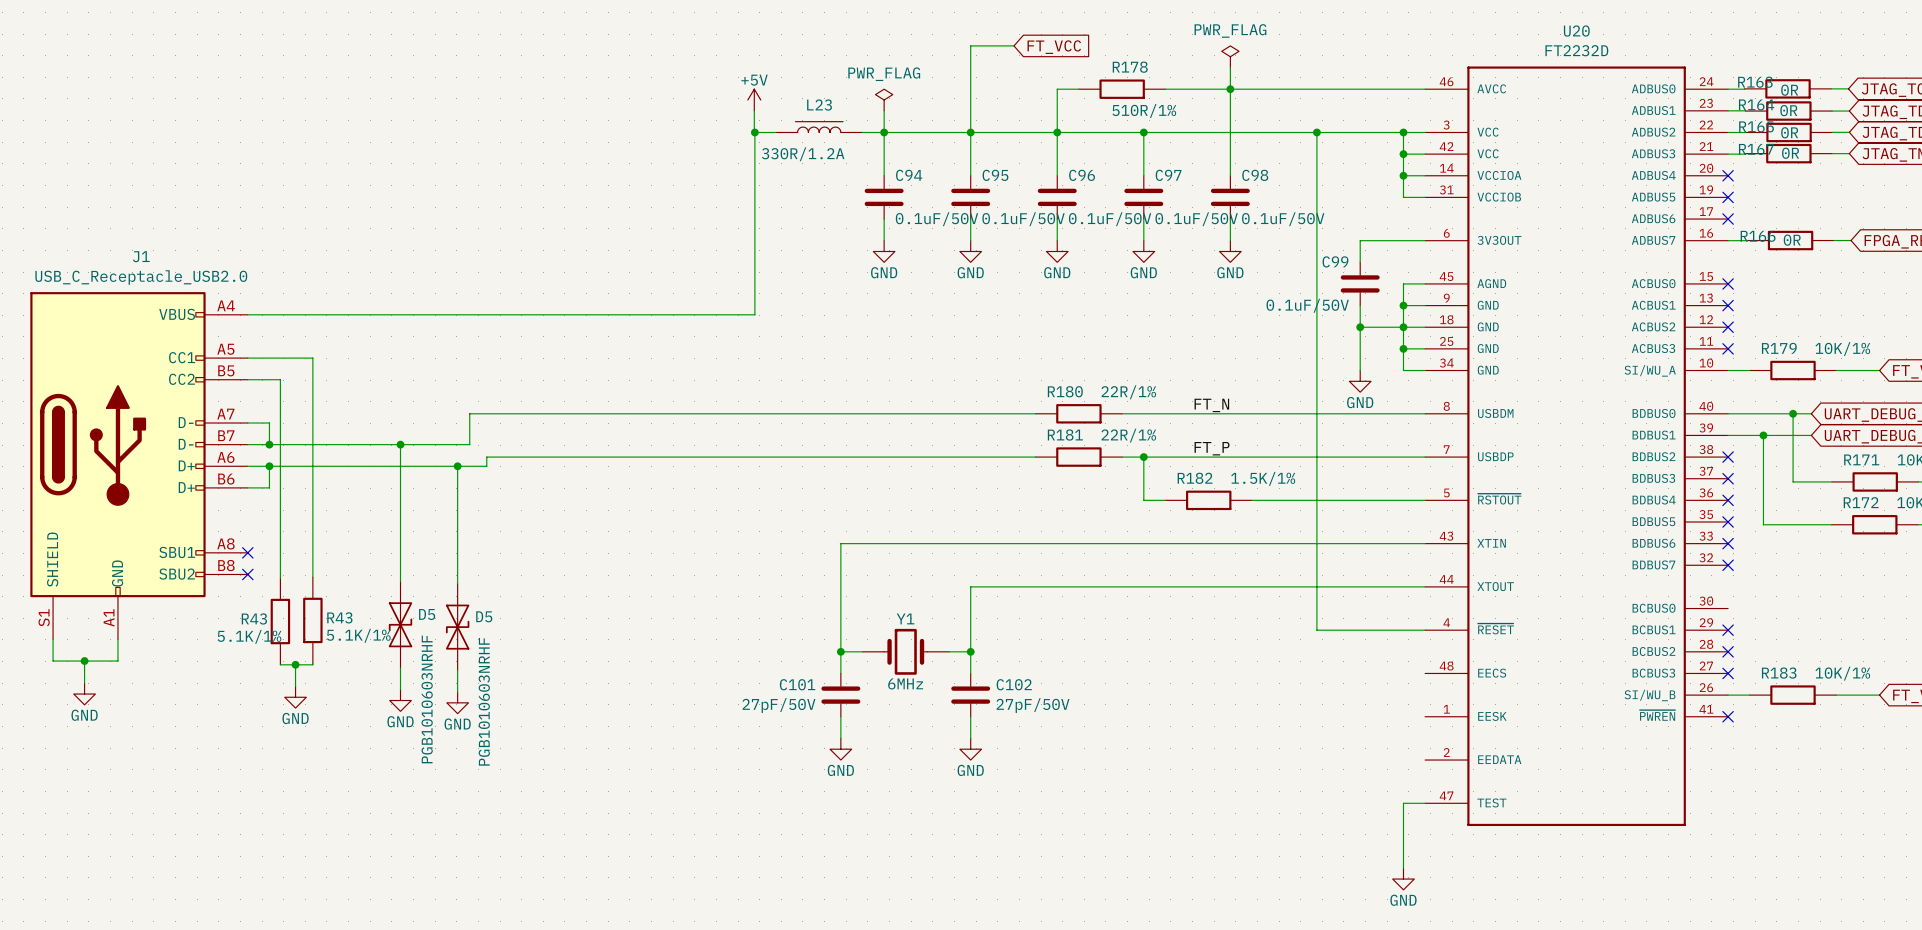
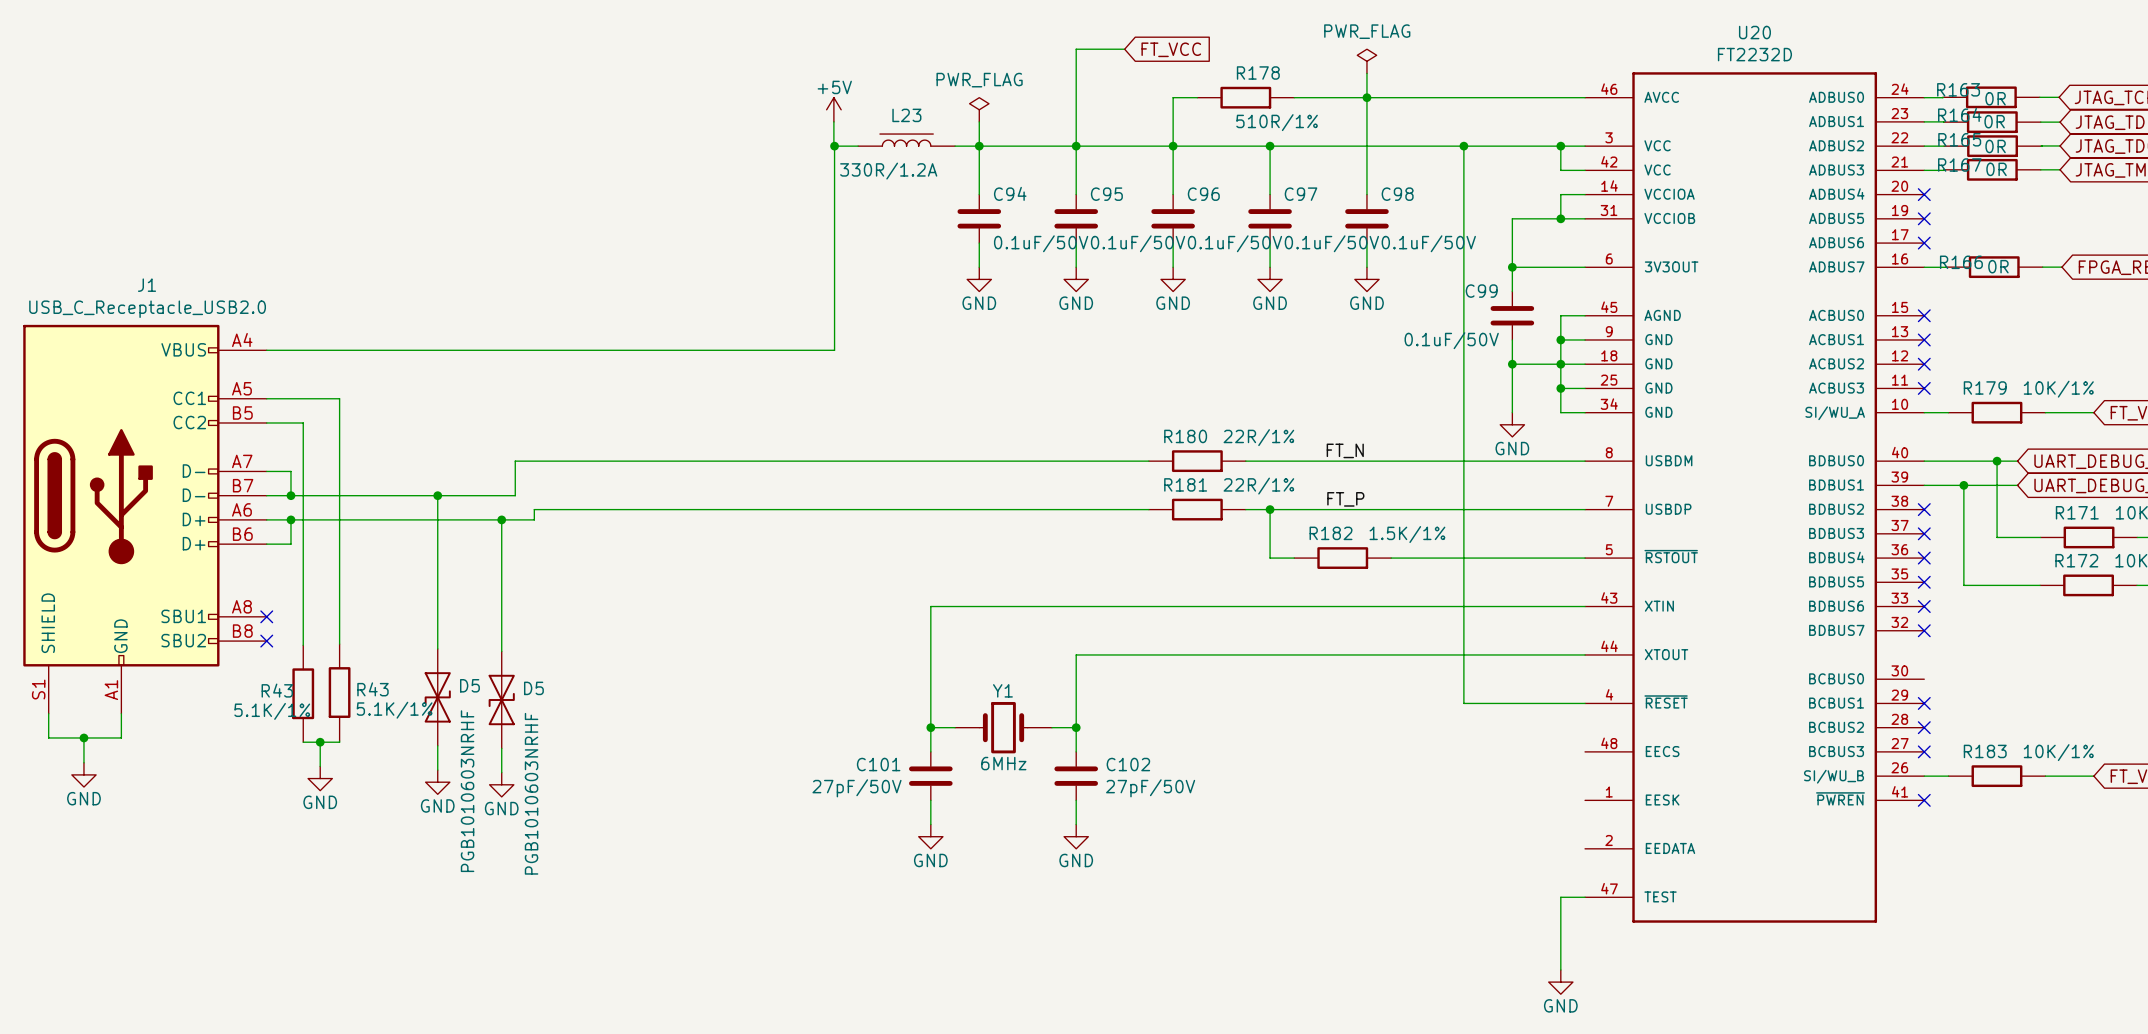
wire: (1403, 154) (1403, 175) -> none
junction: (1403, 154) -> none
junction: (1403, 175) -> none
wire: none -> (1560, 218) (1512, 218) (1512, 267)
junction: none -> (1560, 218)
junction: none -> (1512, 267)

